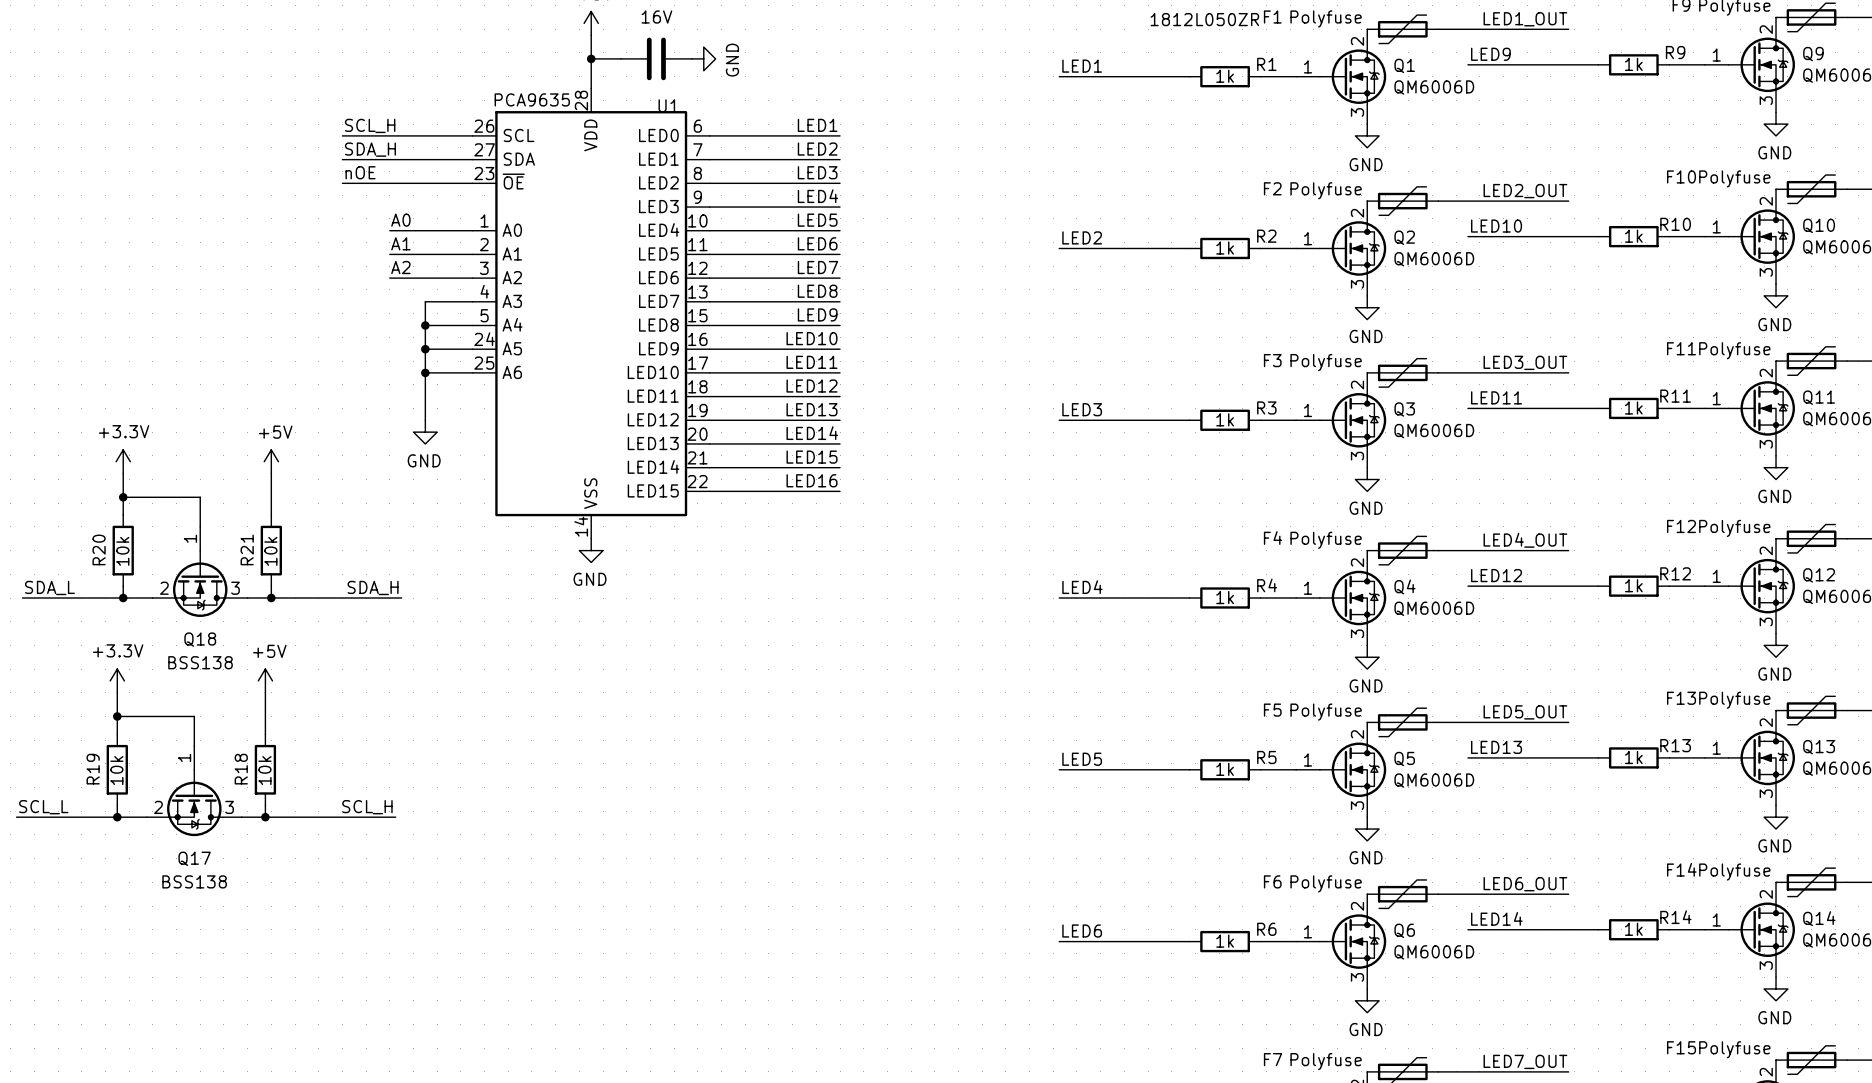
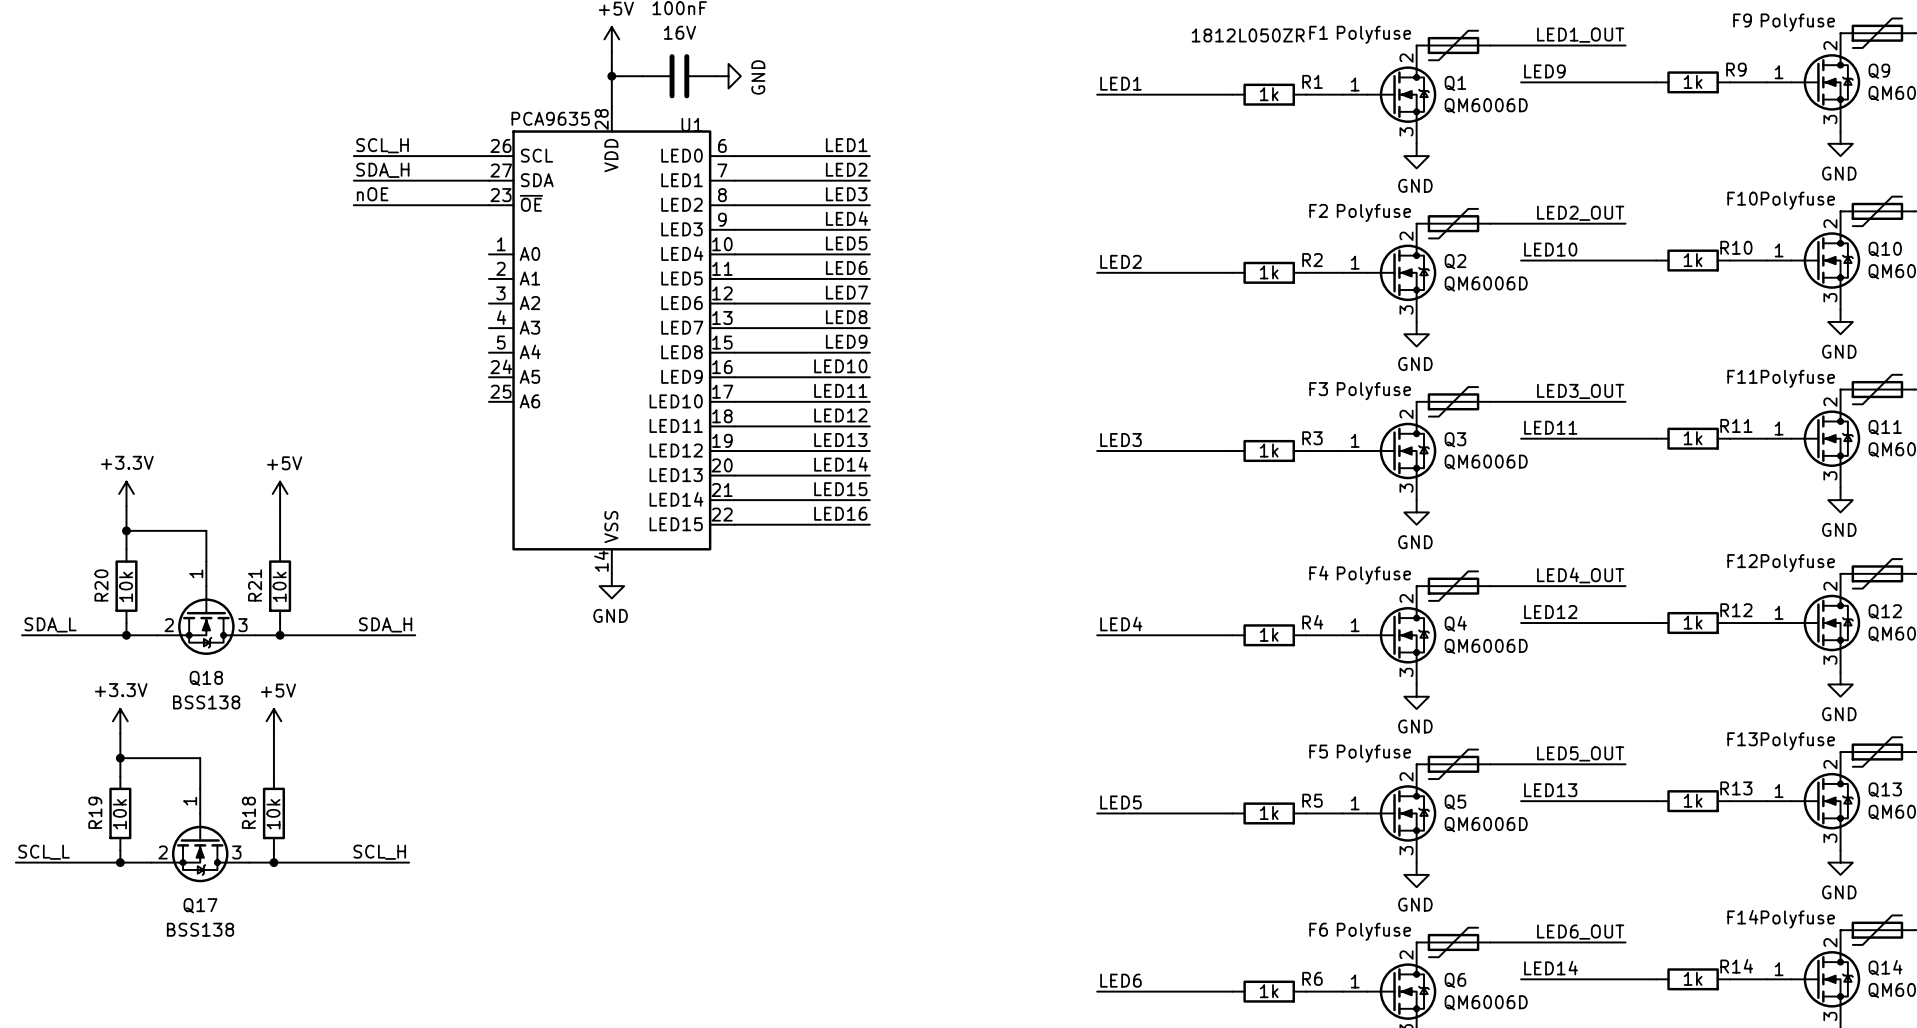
label: A0 (400, 220) -> none
wire: (389, 230) (472, 230) -> none
label: A1 (400, 243) -> none
wire: (389, 254) (472, 254) -> none
label: A2 (400, 267) -> none
wire: (389, 278) (472, 278) -> none
wire: (472, 301) (425, 301) (425, 420) -> none
wire: (425, 325) (472, 325) -> none
junction: (425, 325) -> none
wire: (425, 349) (472, 349) -> none
junction: (425, 349) -> none
wire: (425, 372) (472, 372) -> none
junction: (425, 372) -> none
power symbol: GND (425, 432) -> none

